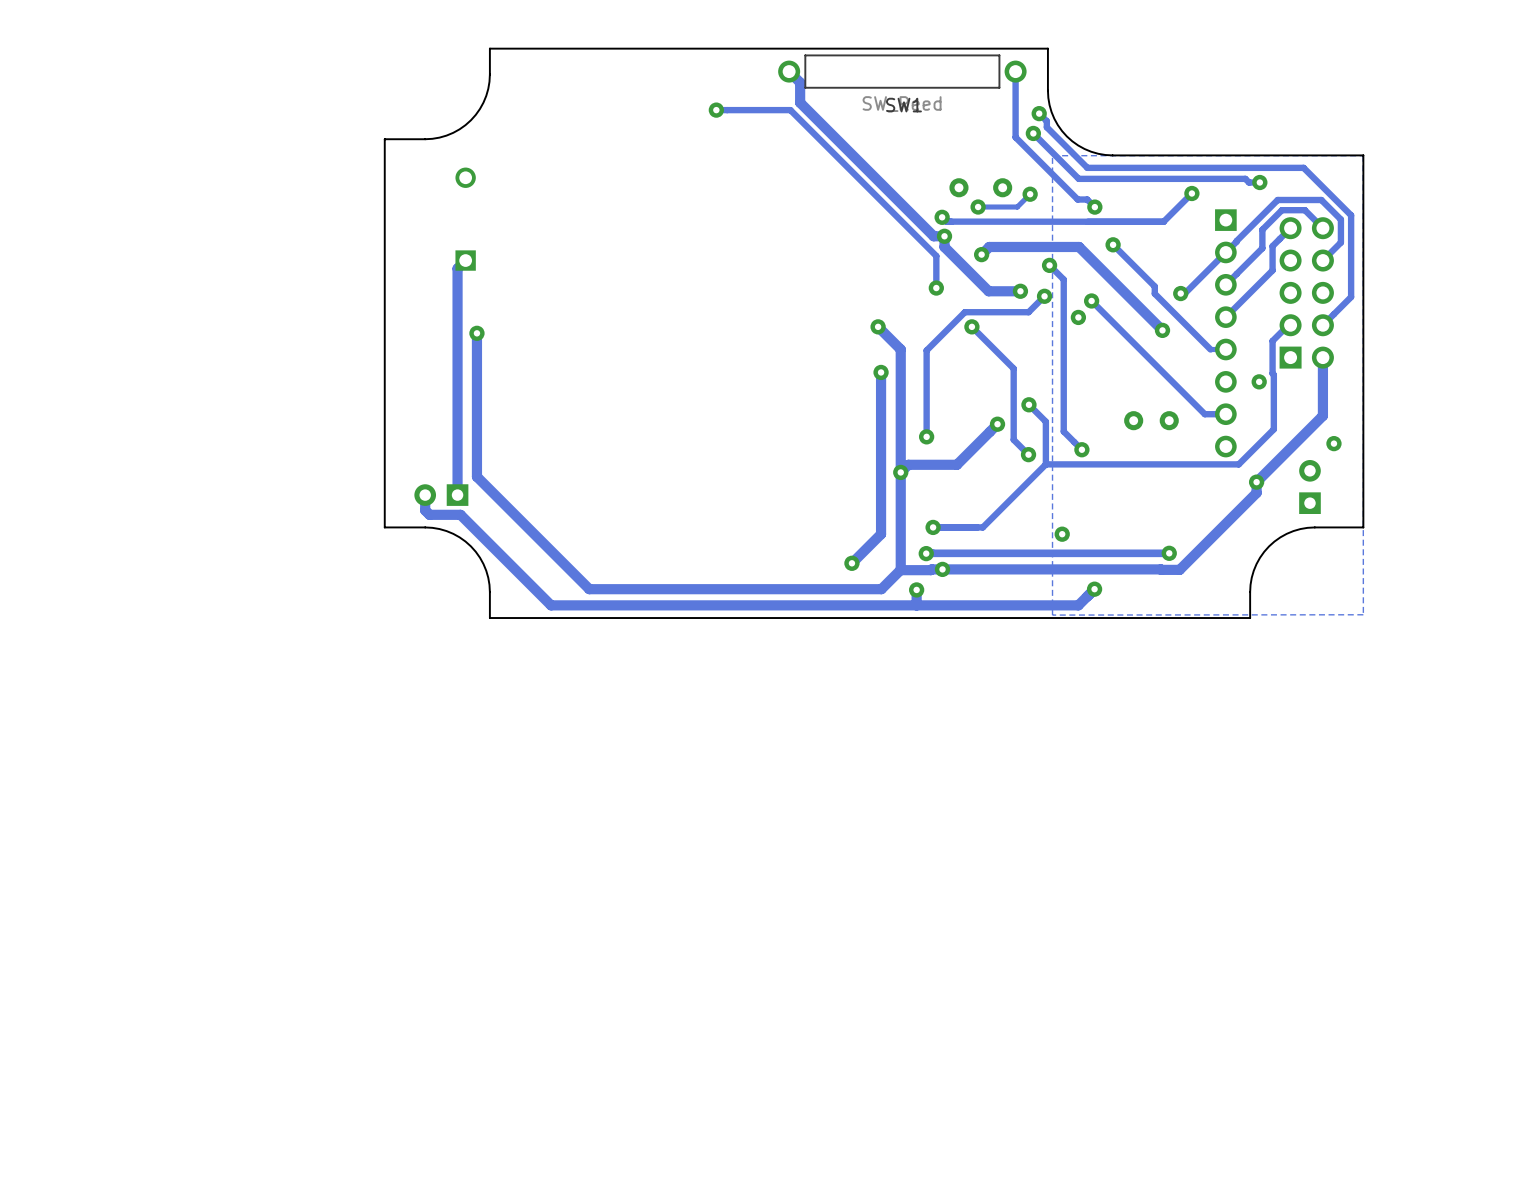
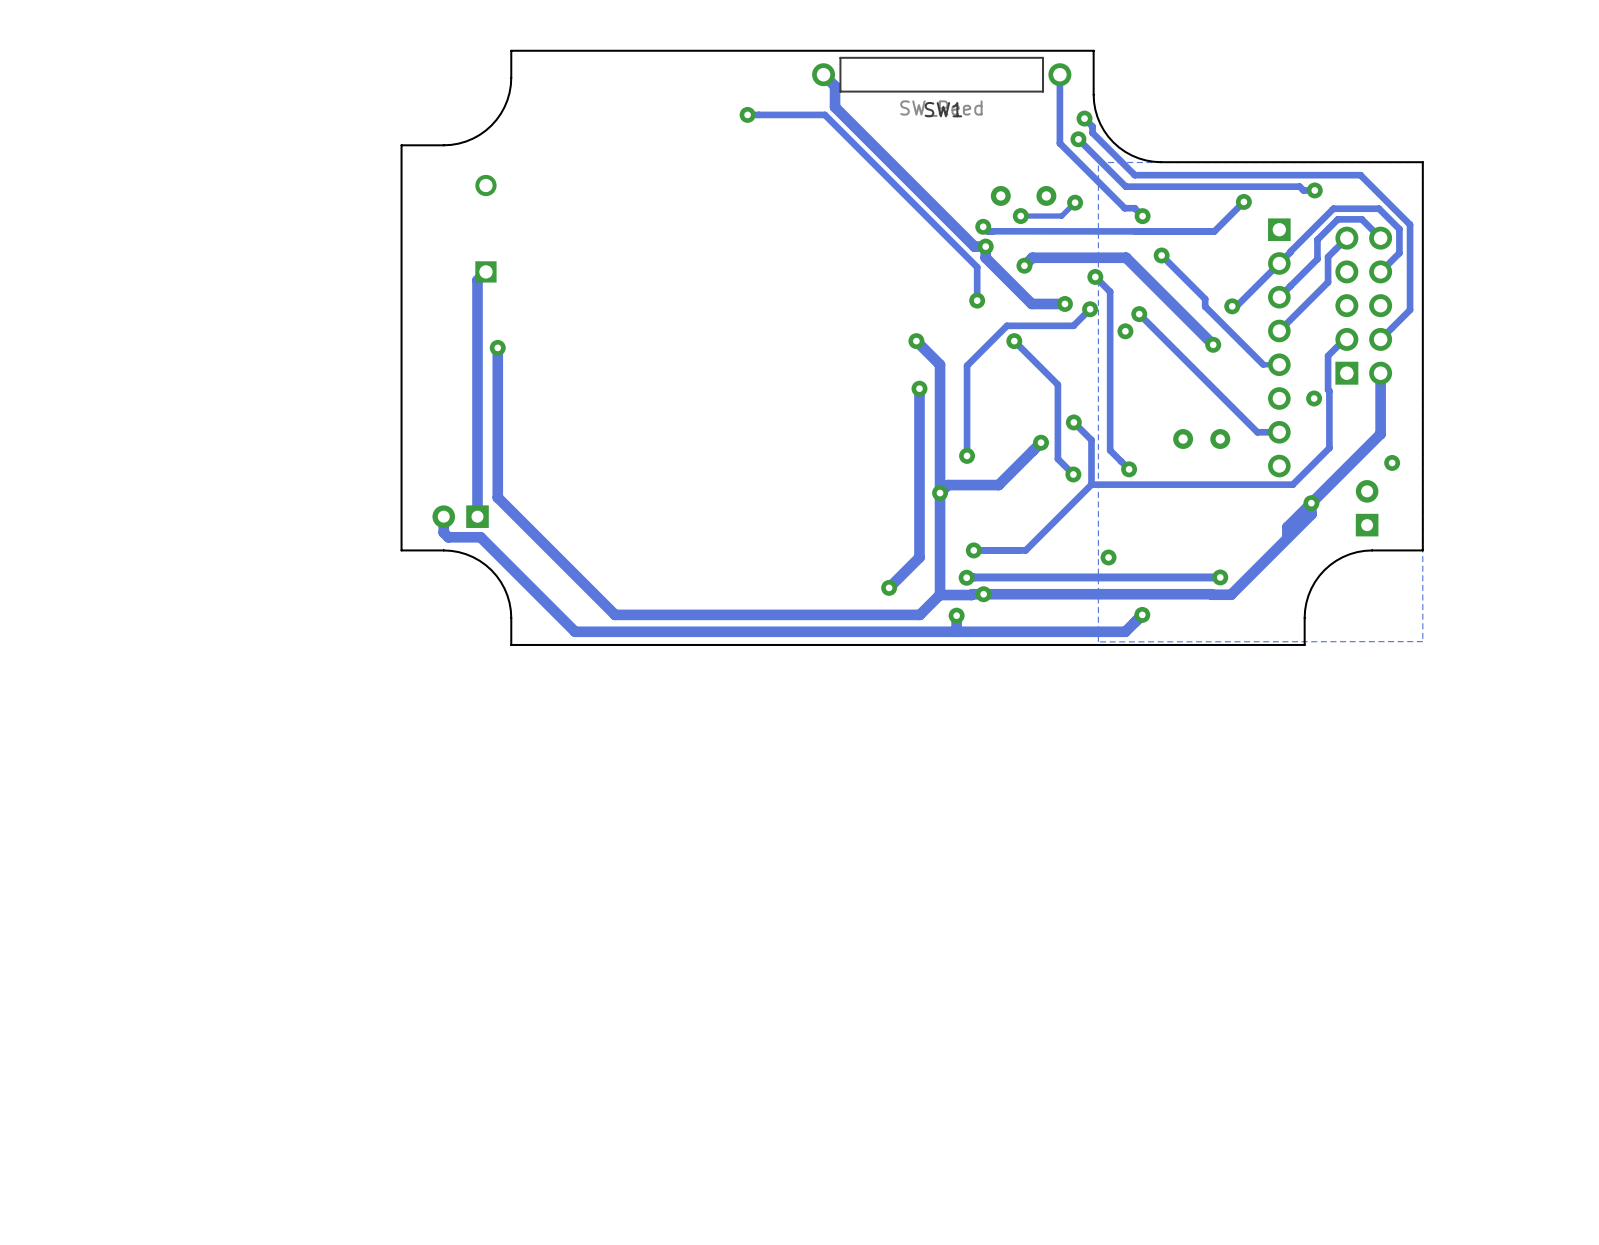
track: none -> (1311, 503) (1287, 527) (1287, 535)

